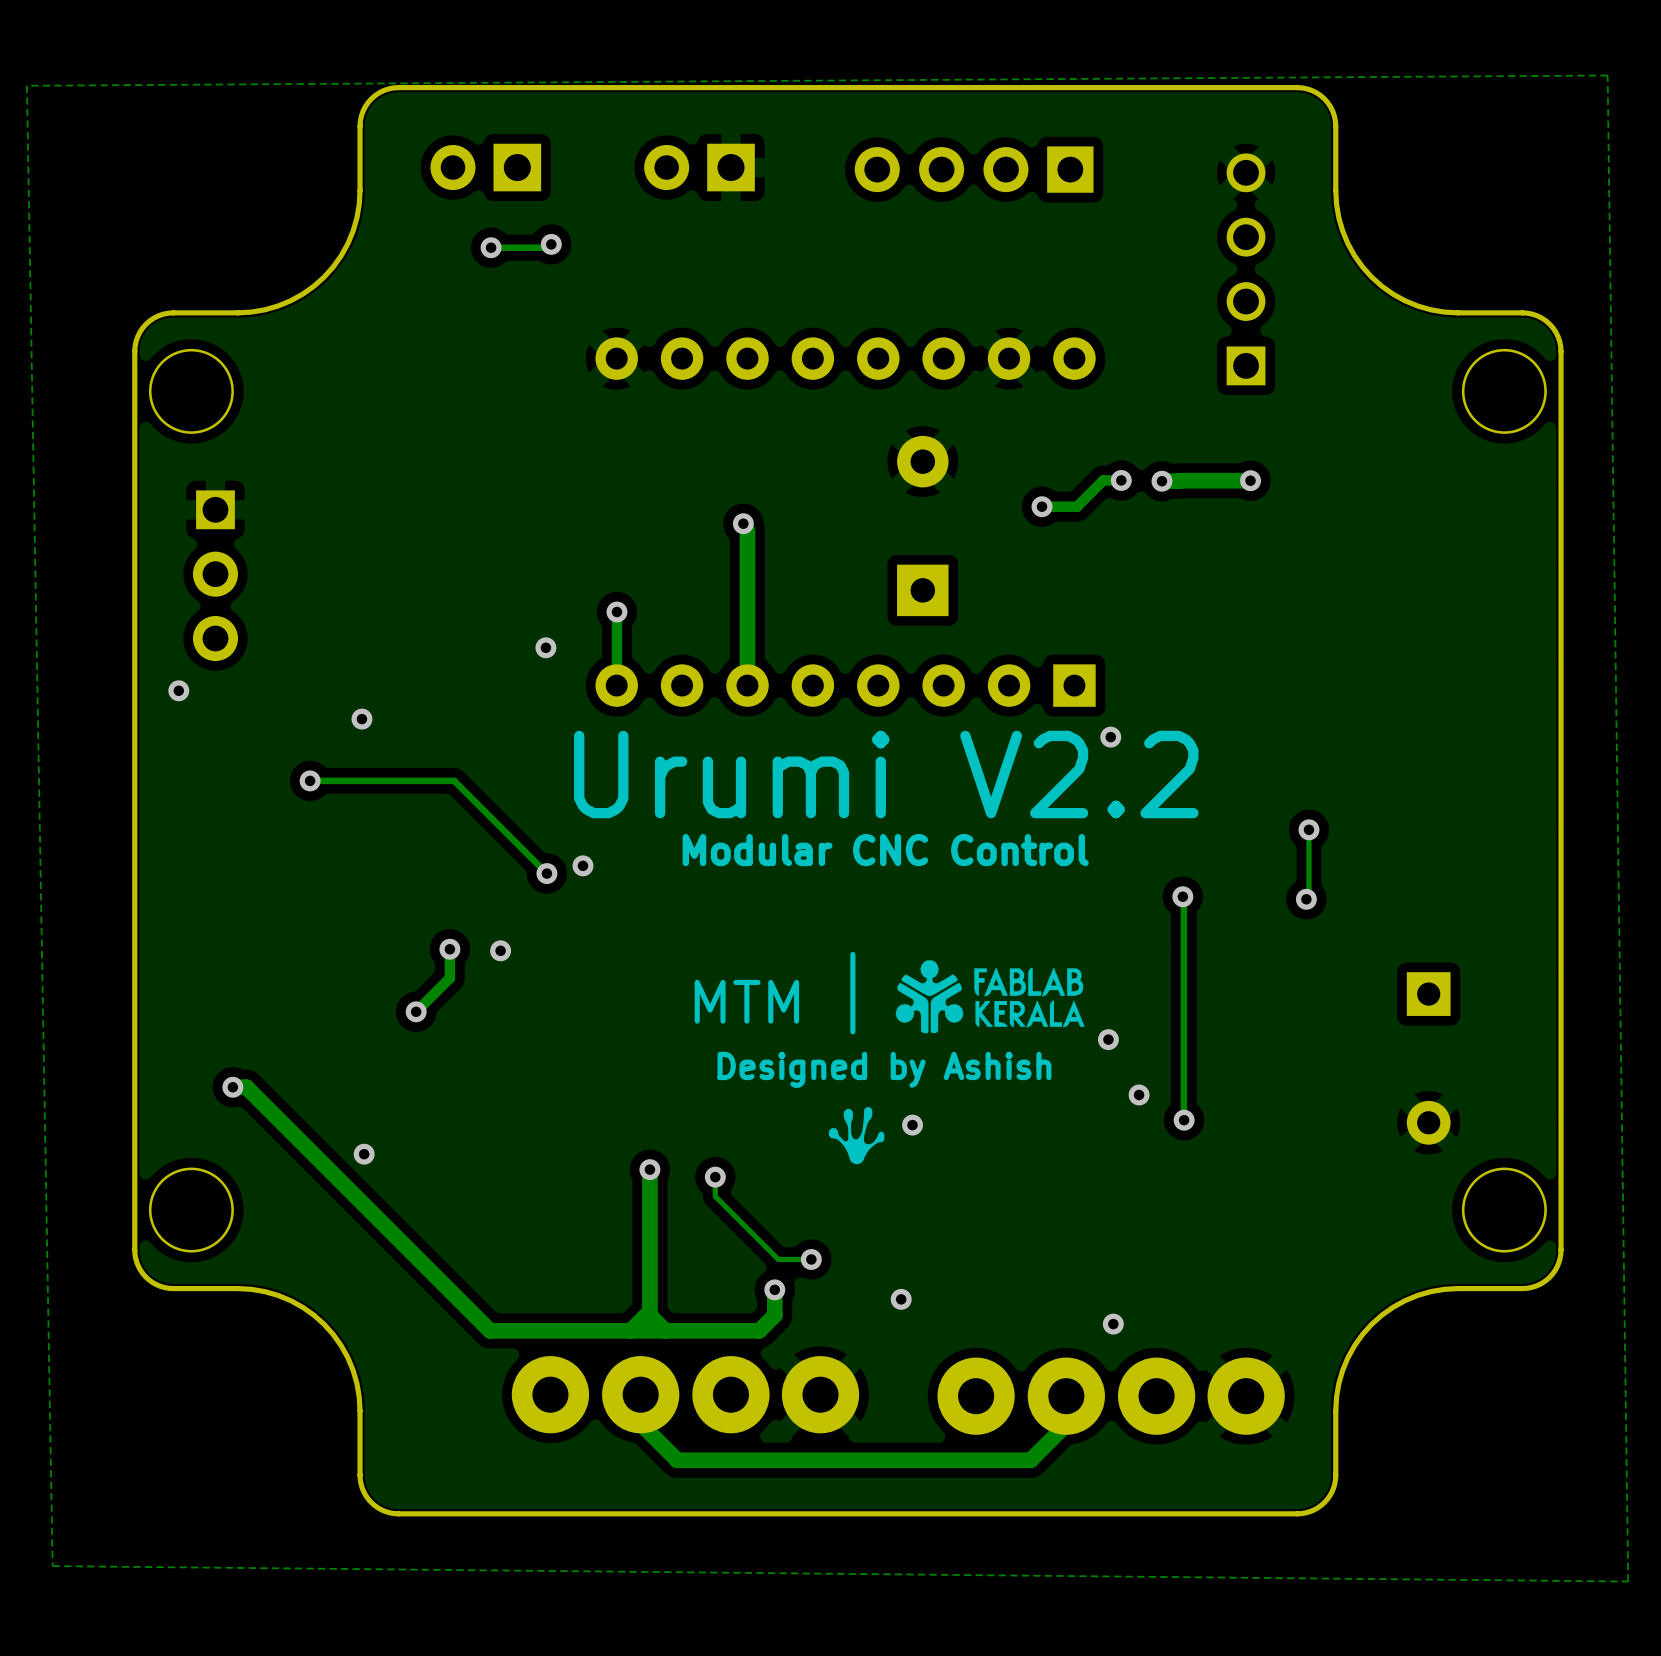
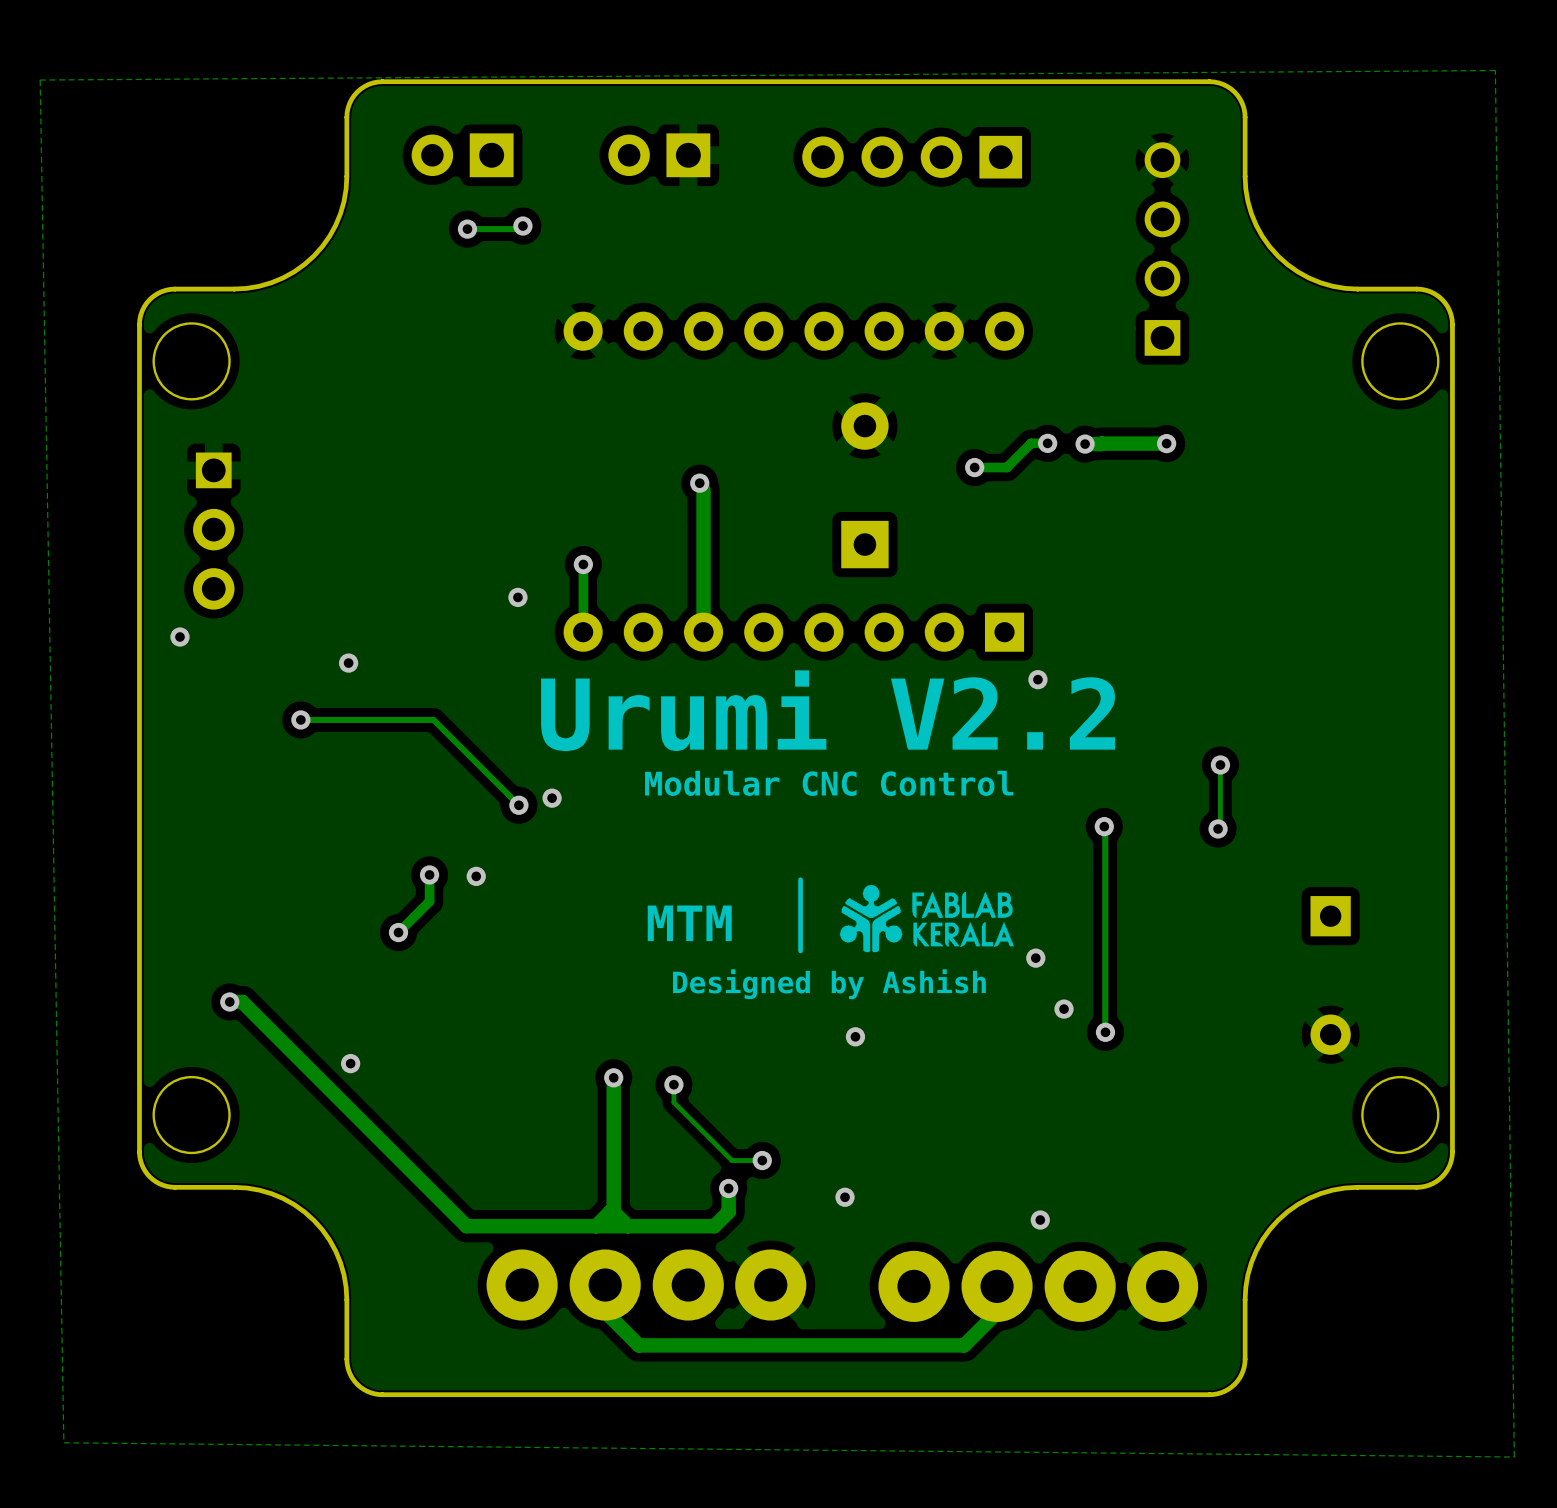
drawing: [828, 1107, 885, 1165] -> none

